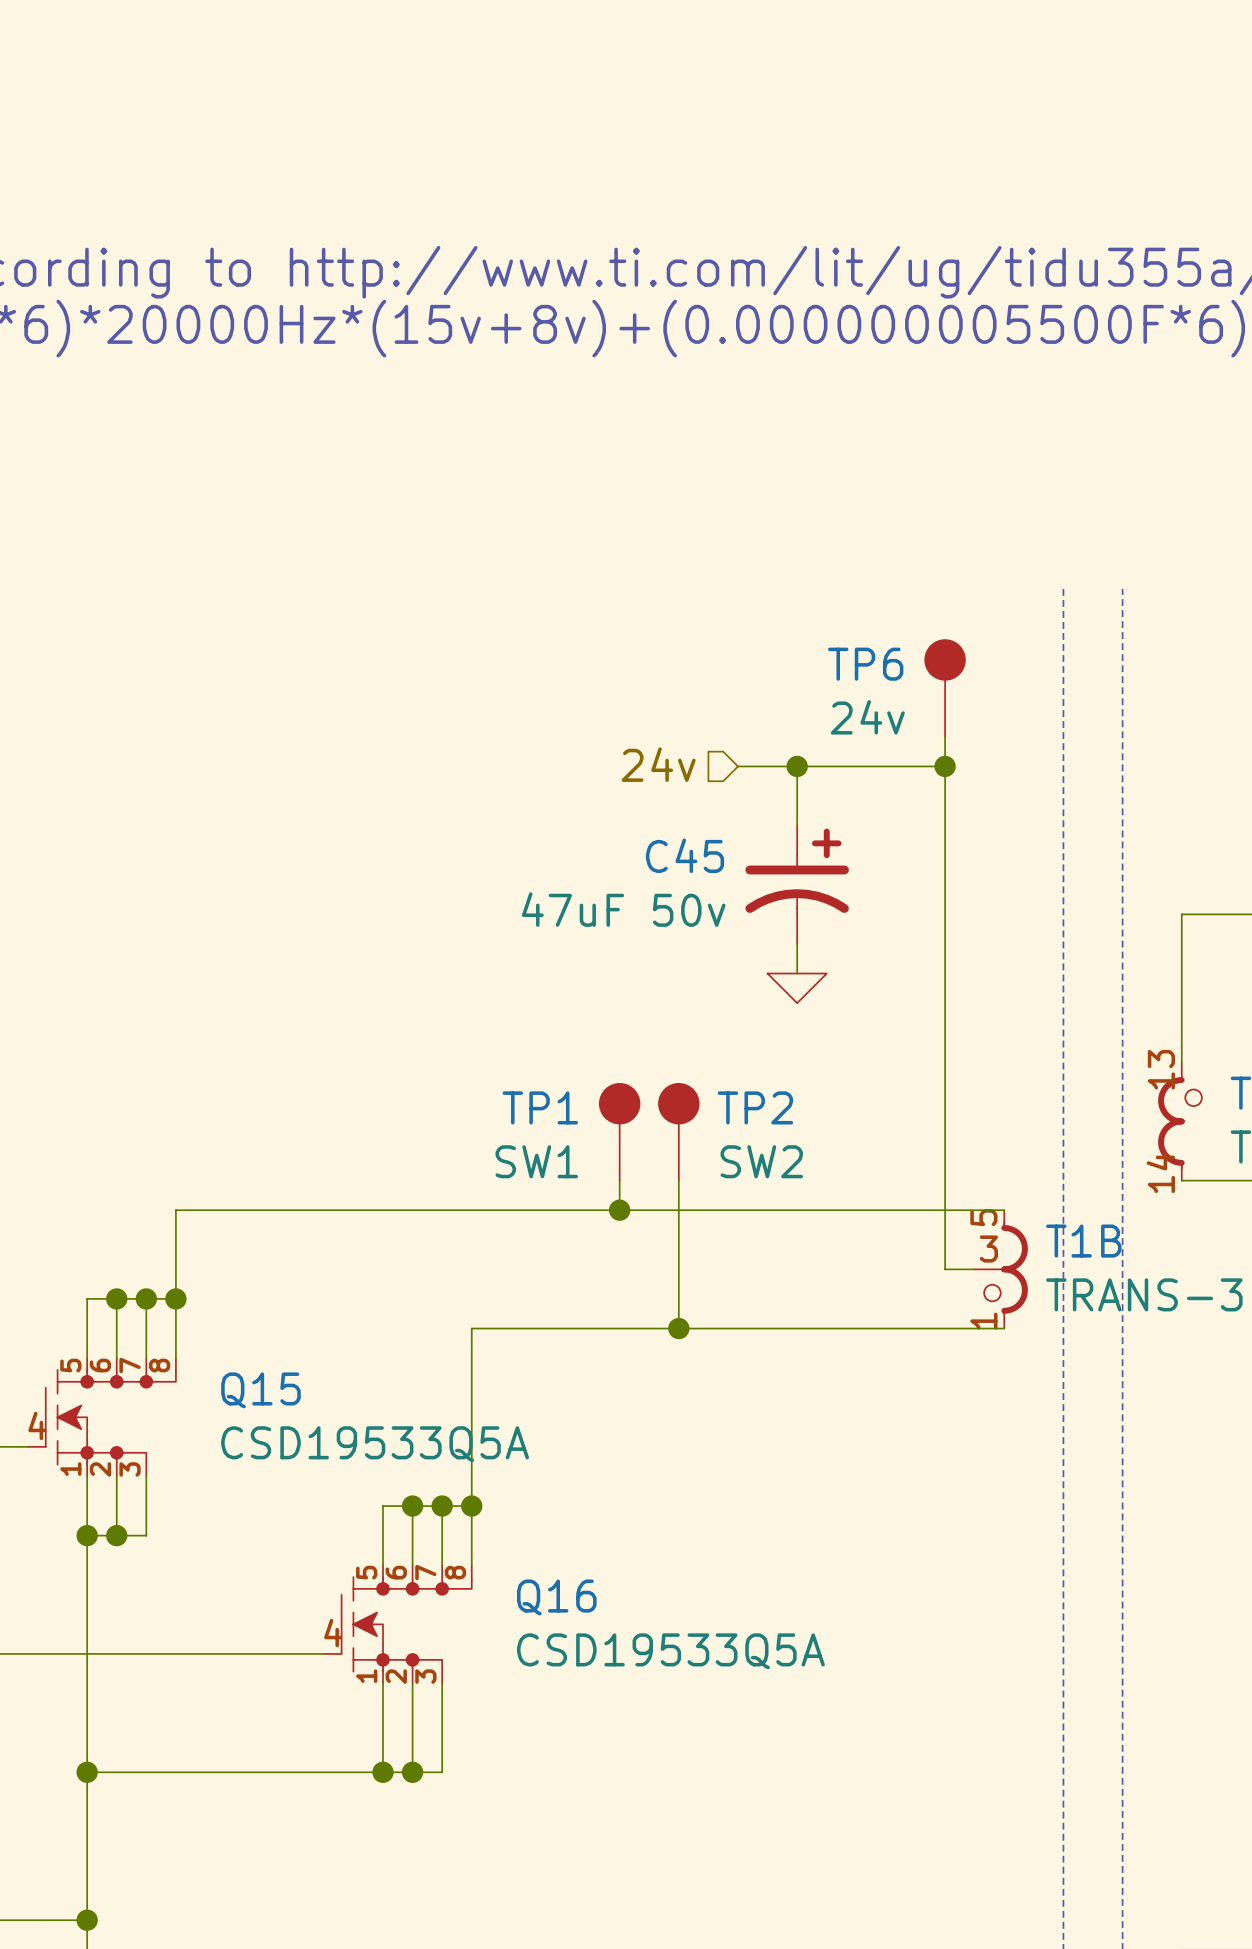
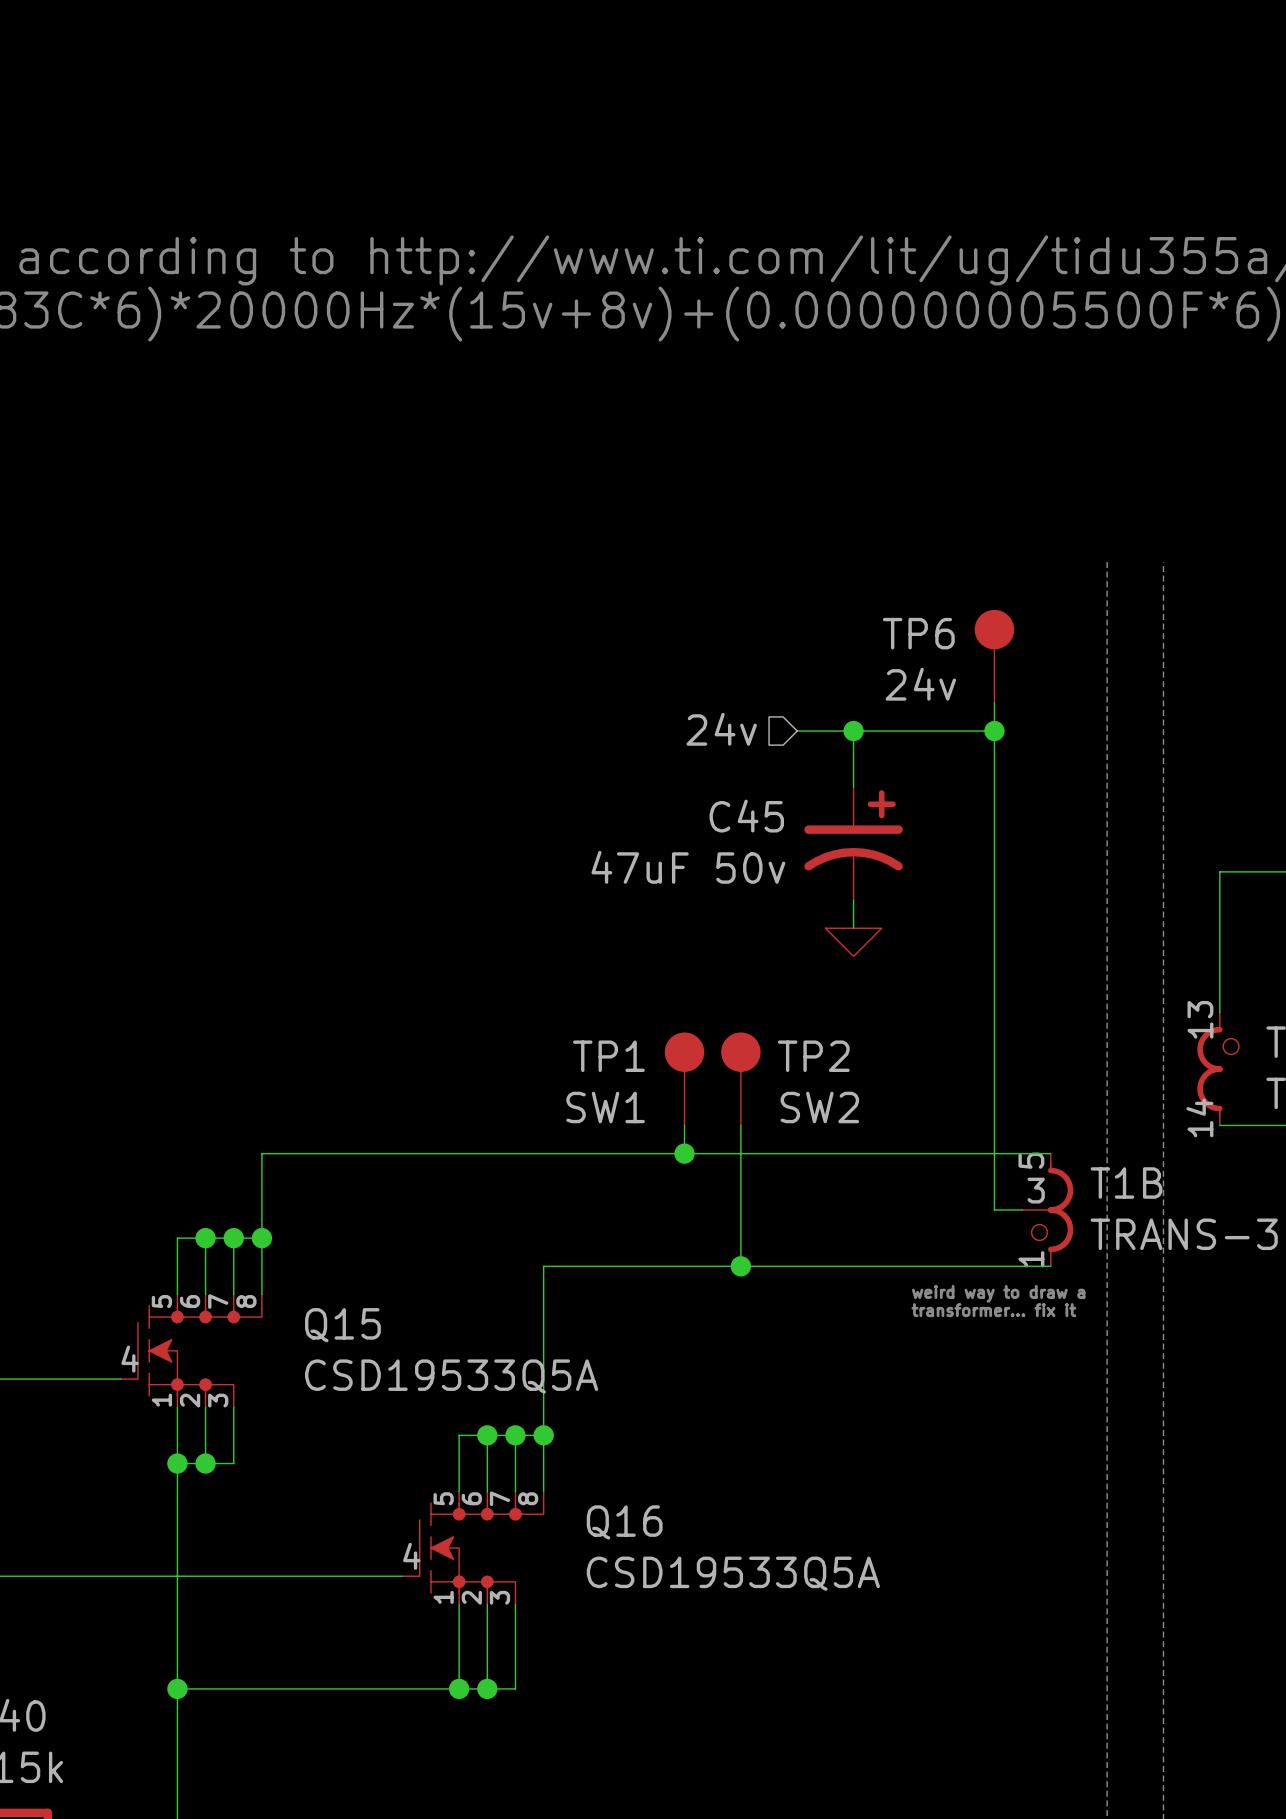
text: none -> weird way to draw a (998, 1293)
text: none -> transformer... fix it (993, 1310)

